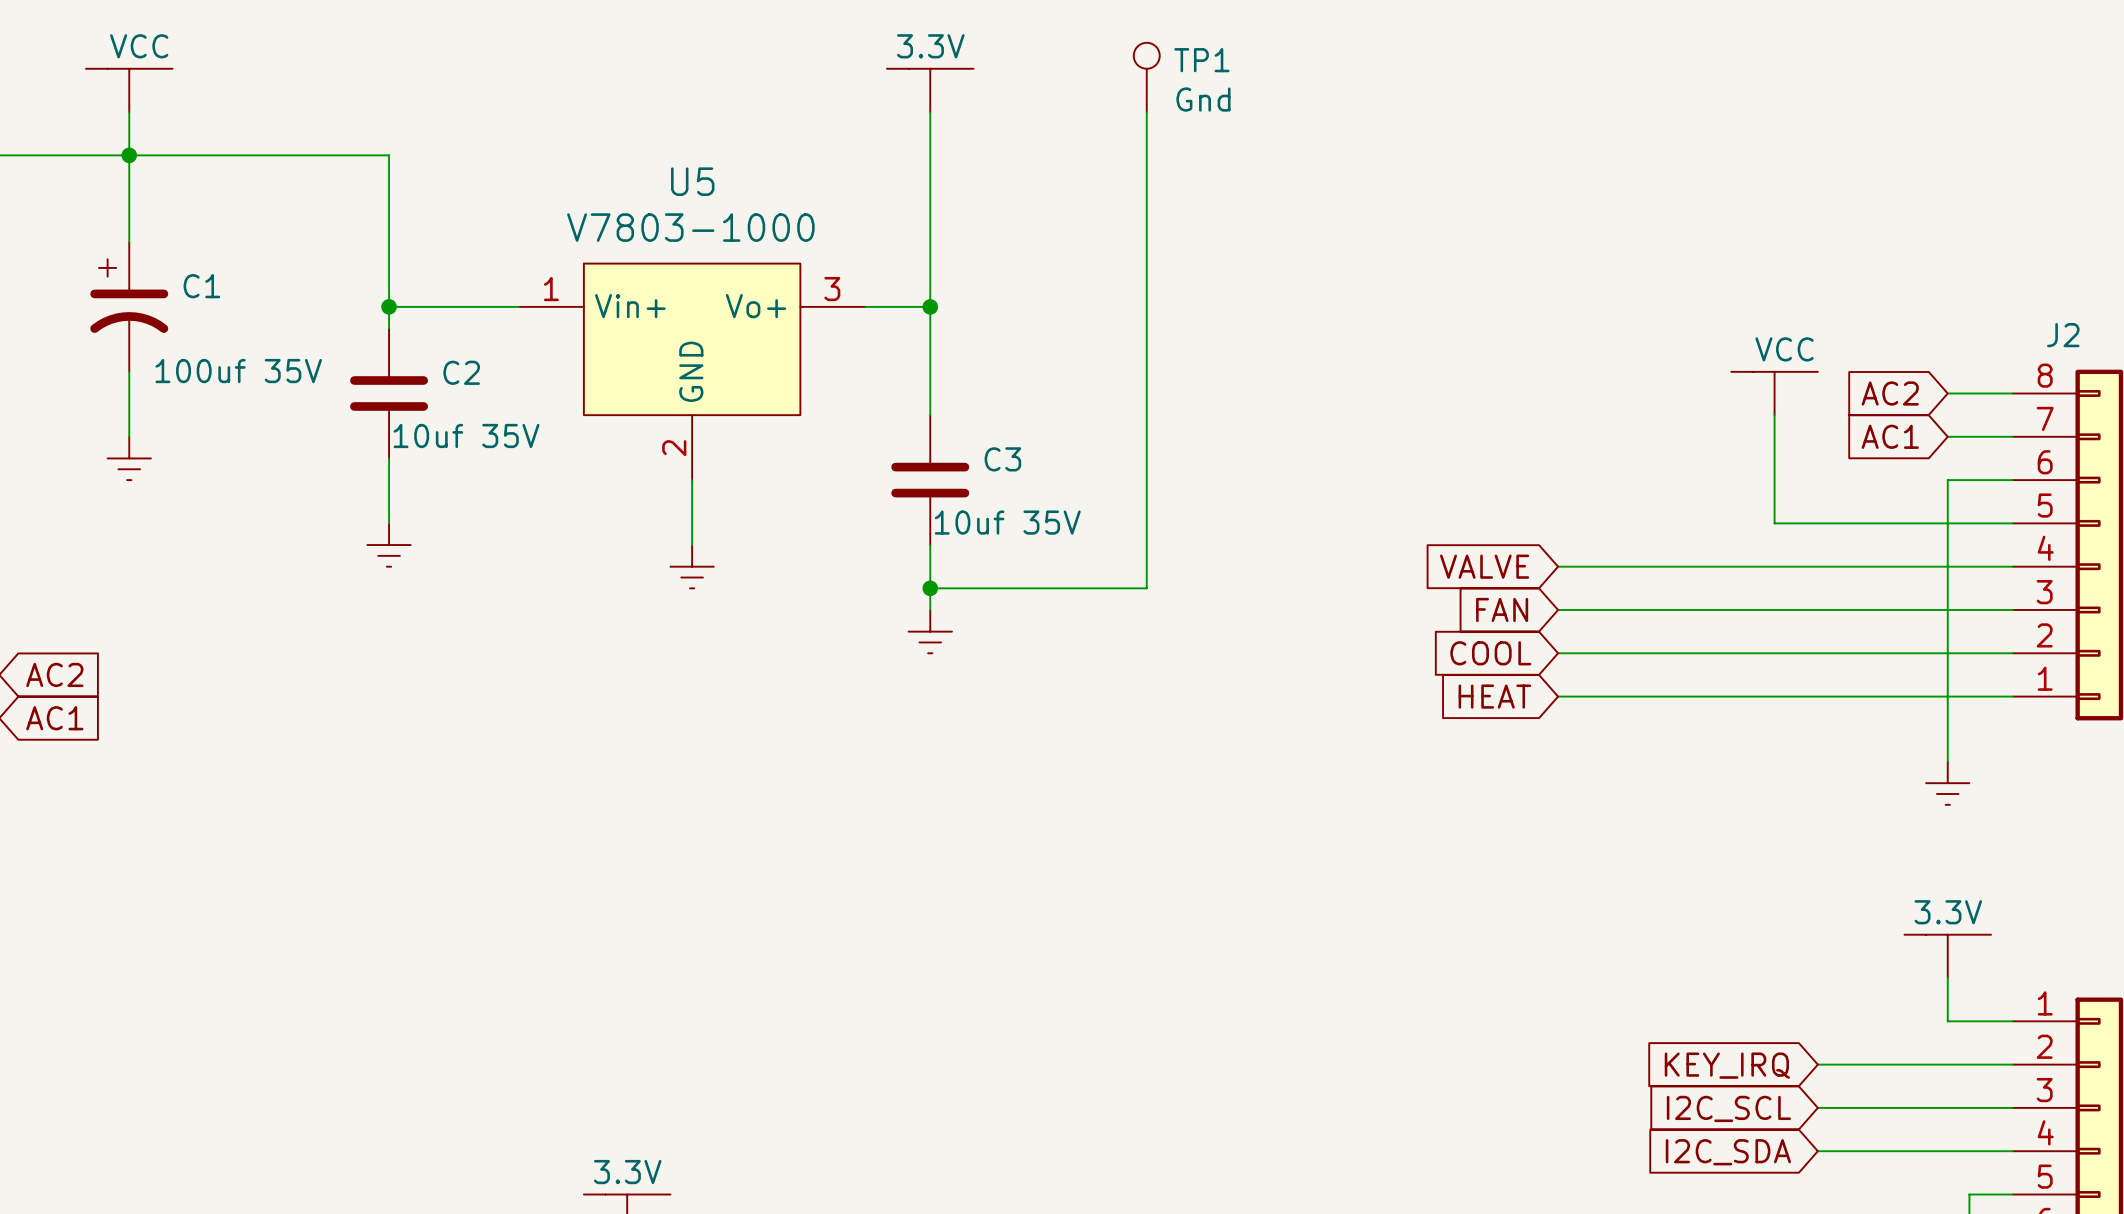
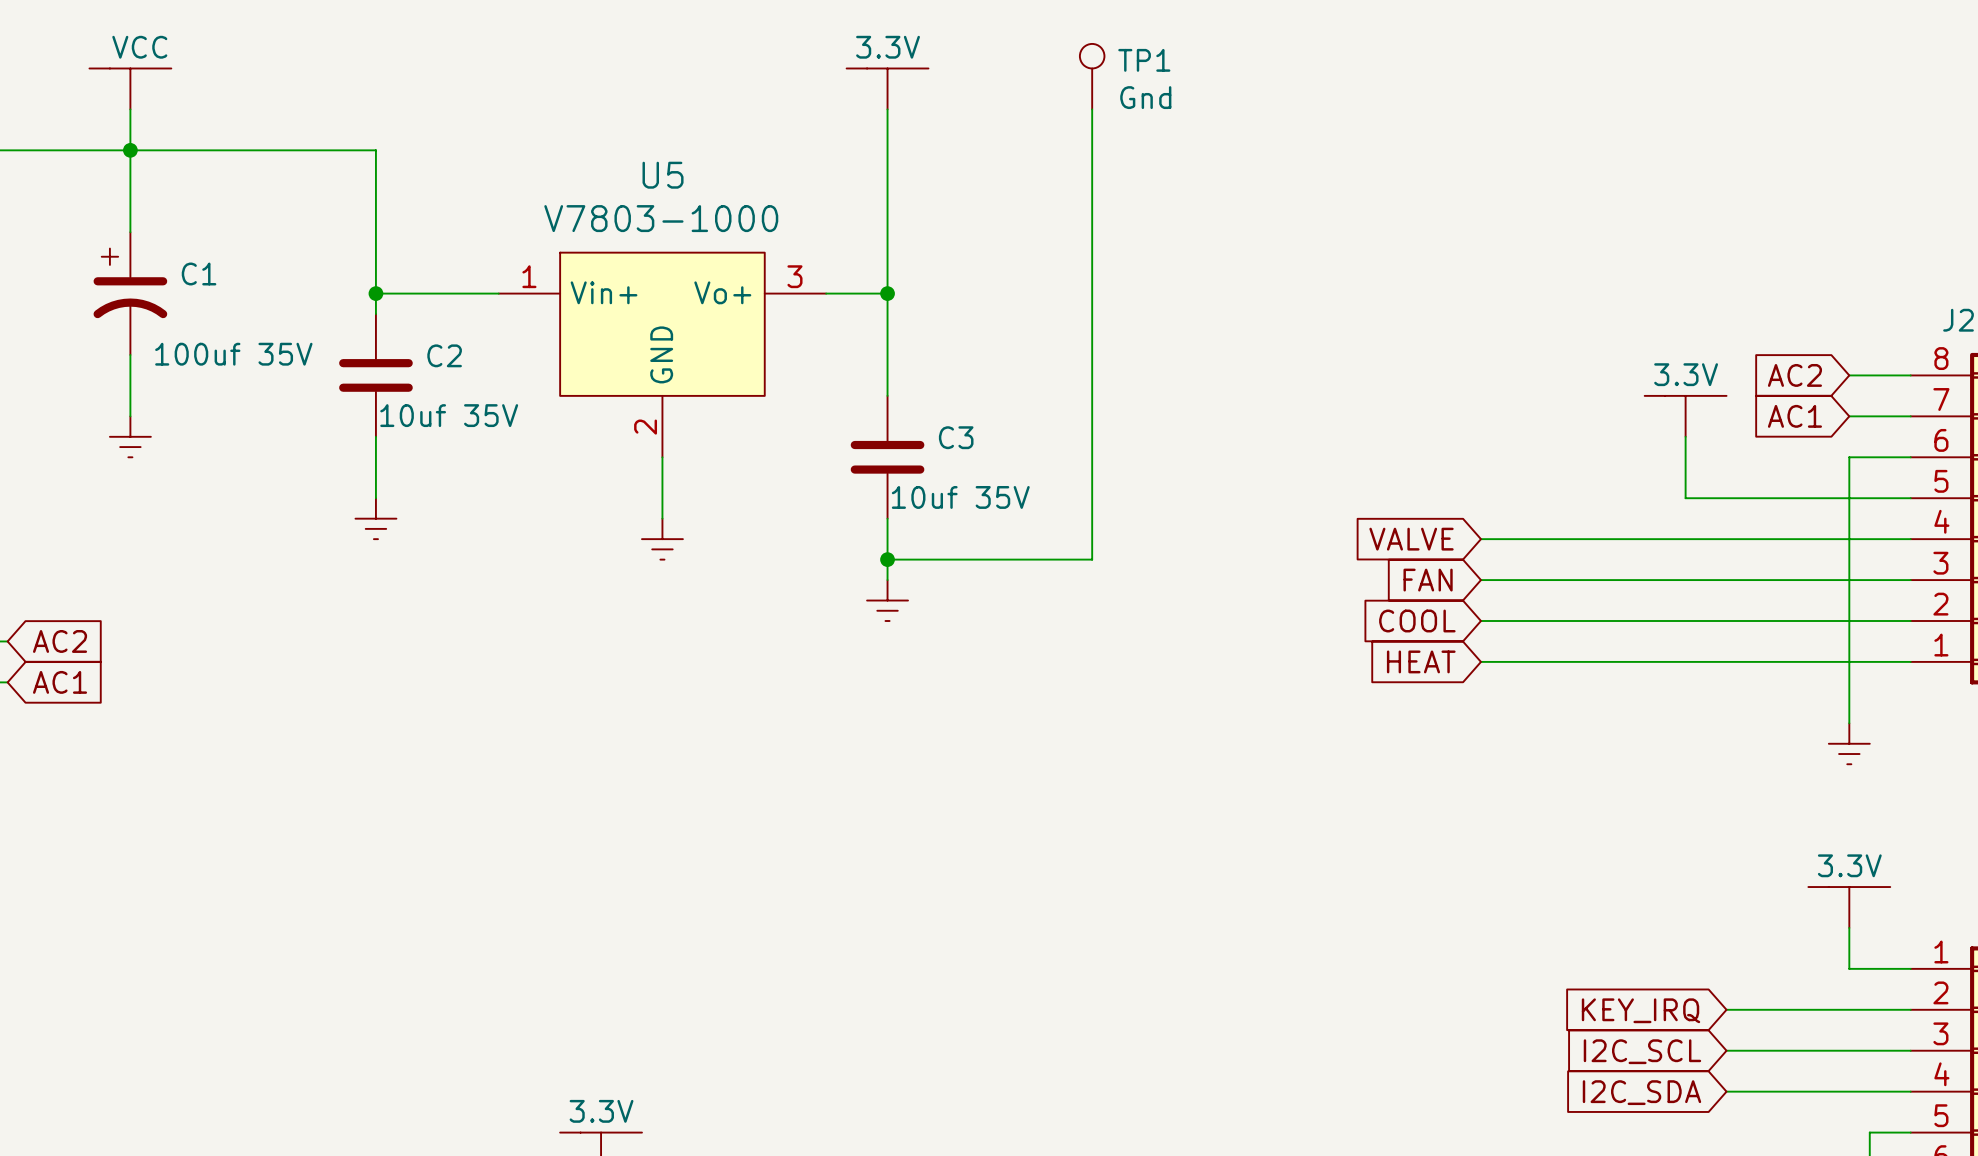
part: VCC (1774, 393) -> none
part: none -> 3.3V (1685, 416)

